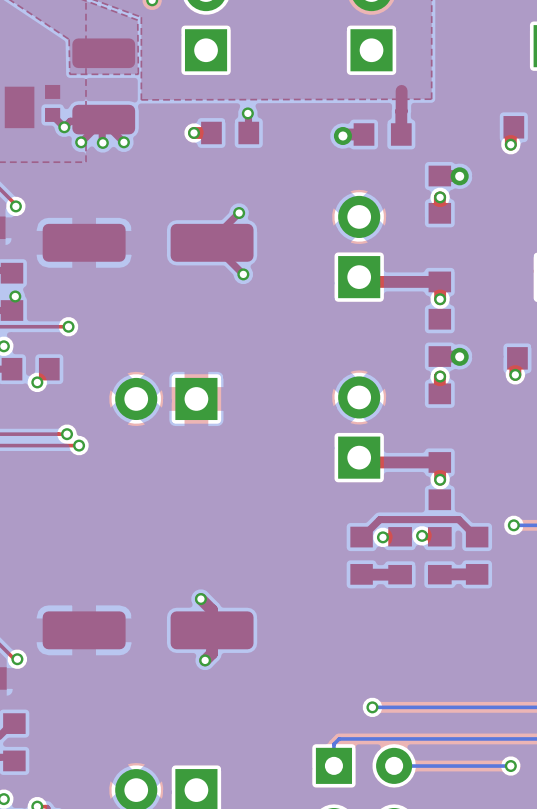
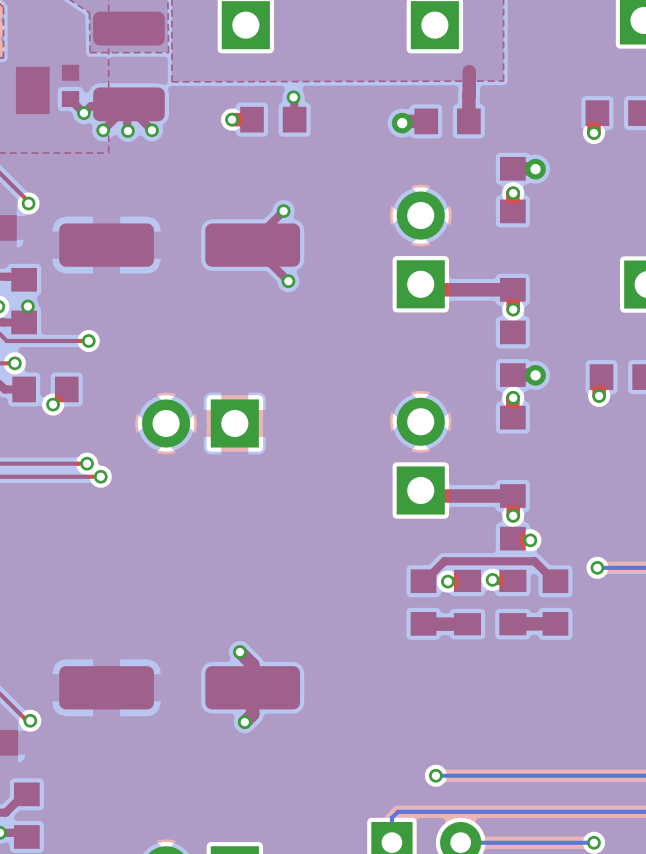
via: none -> (530, 540)

